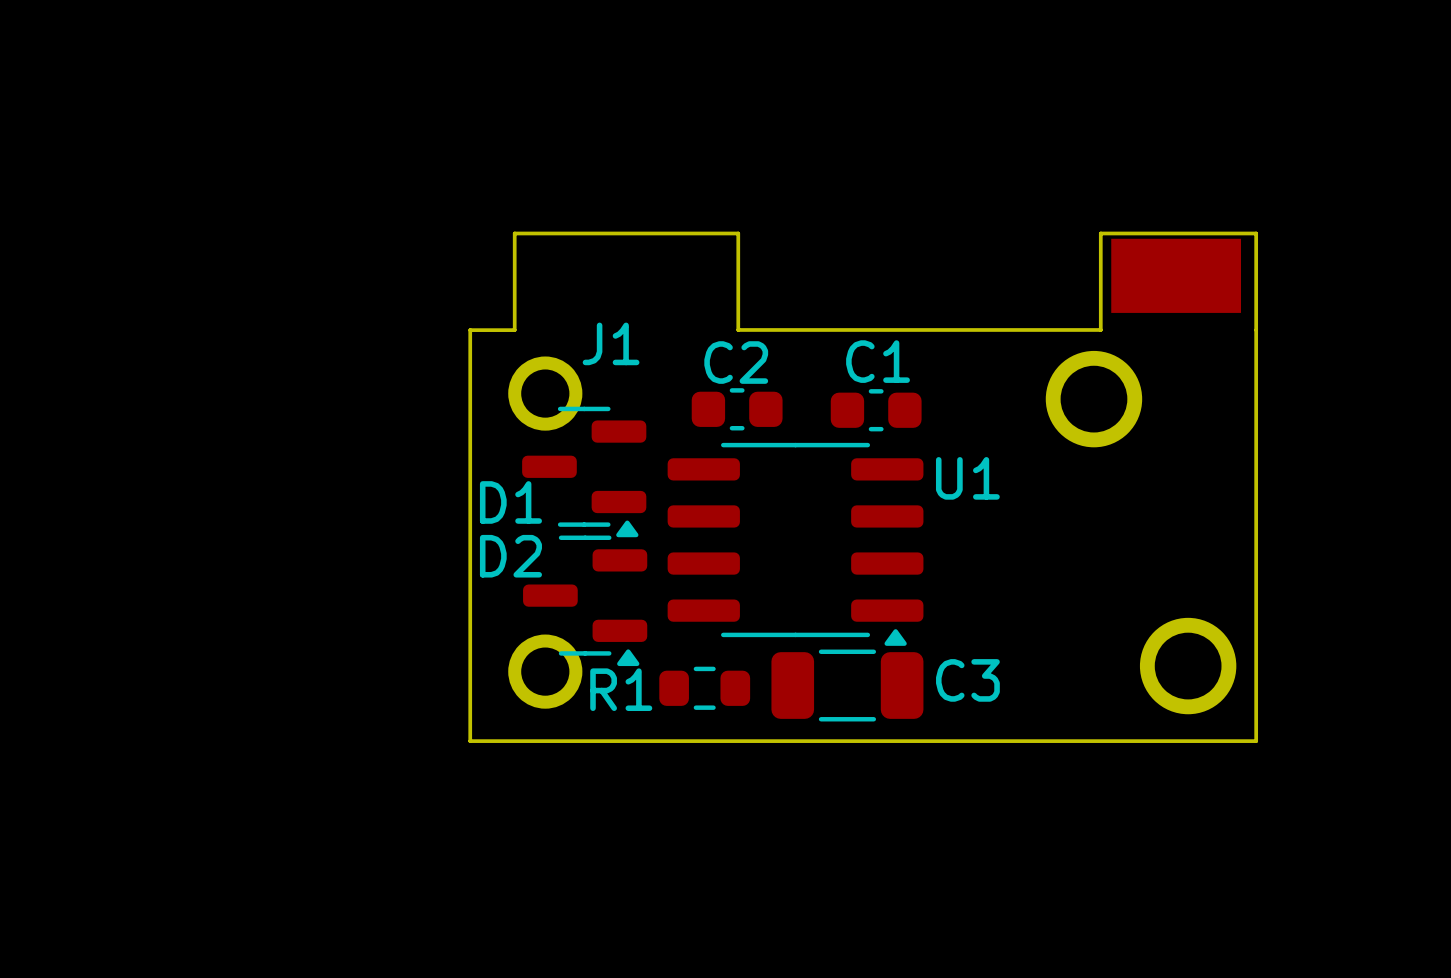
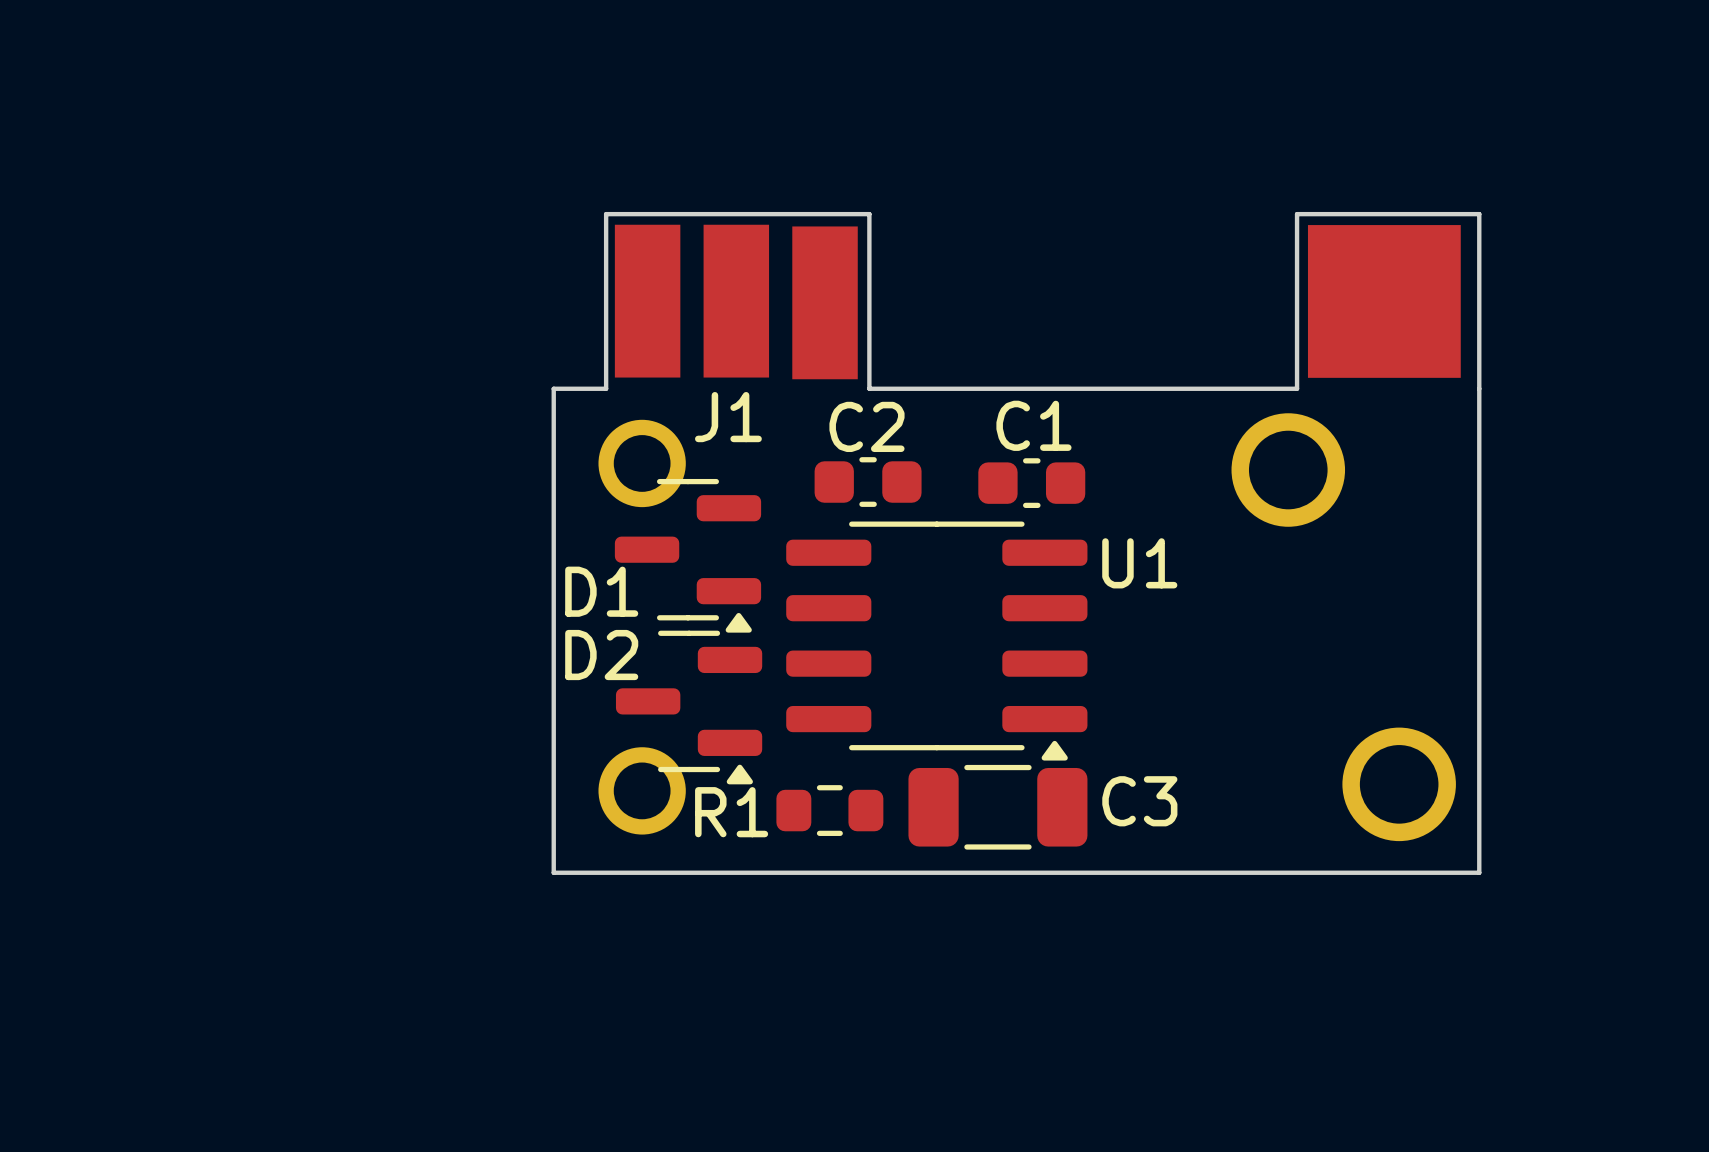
J1 footprint: [512, 231, 1259, 332] -> [603, 211, 1482, 391]

